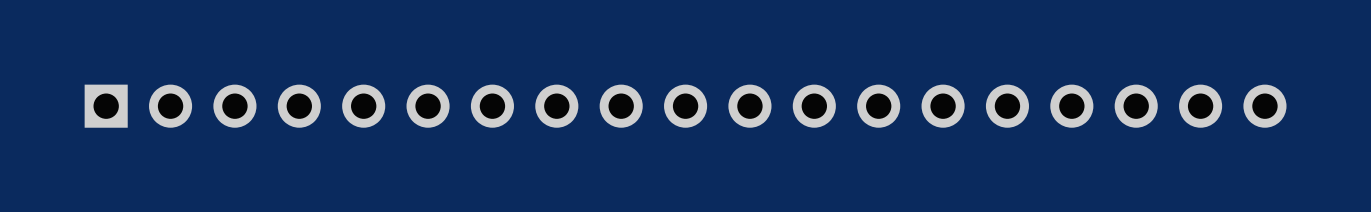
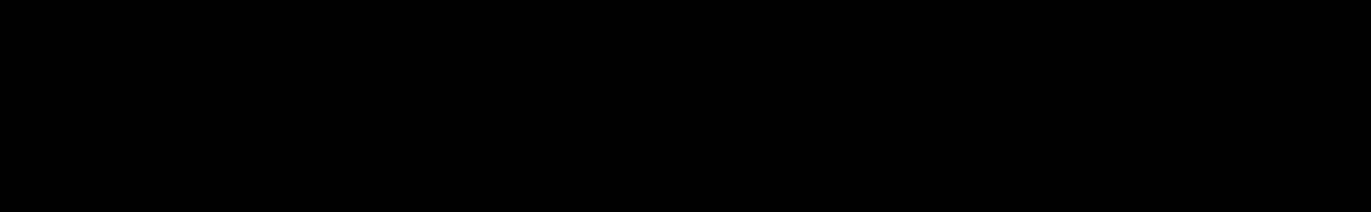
part: (685, 106) -> none

